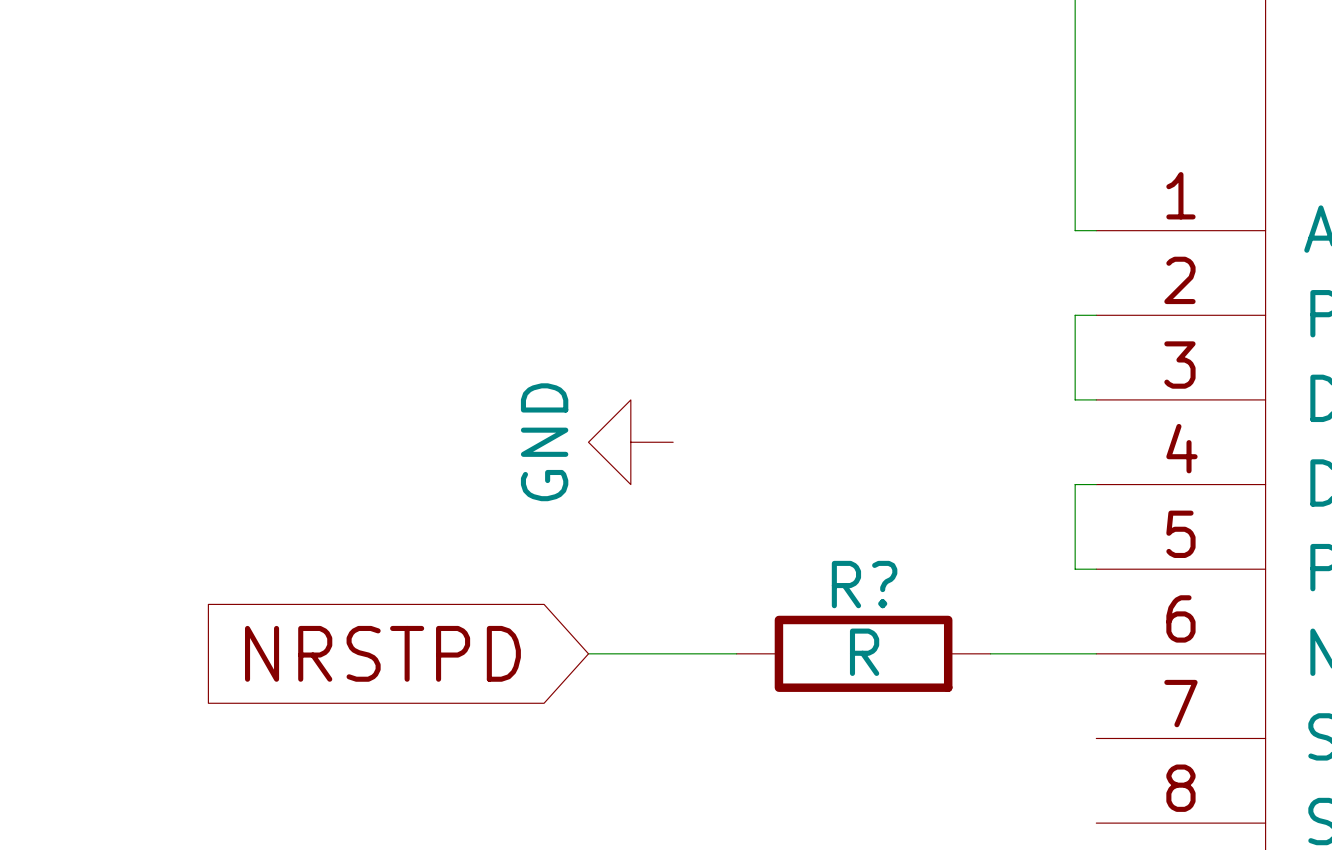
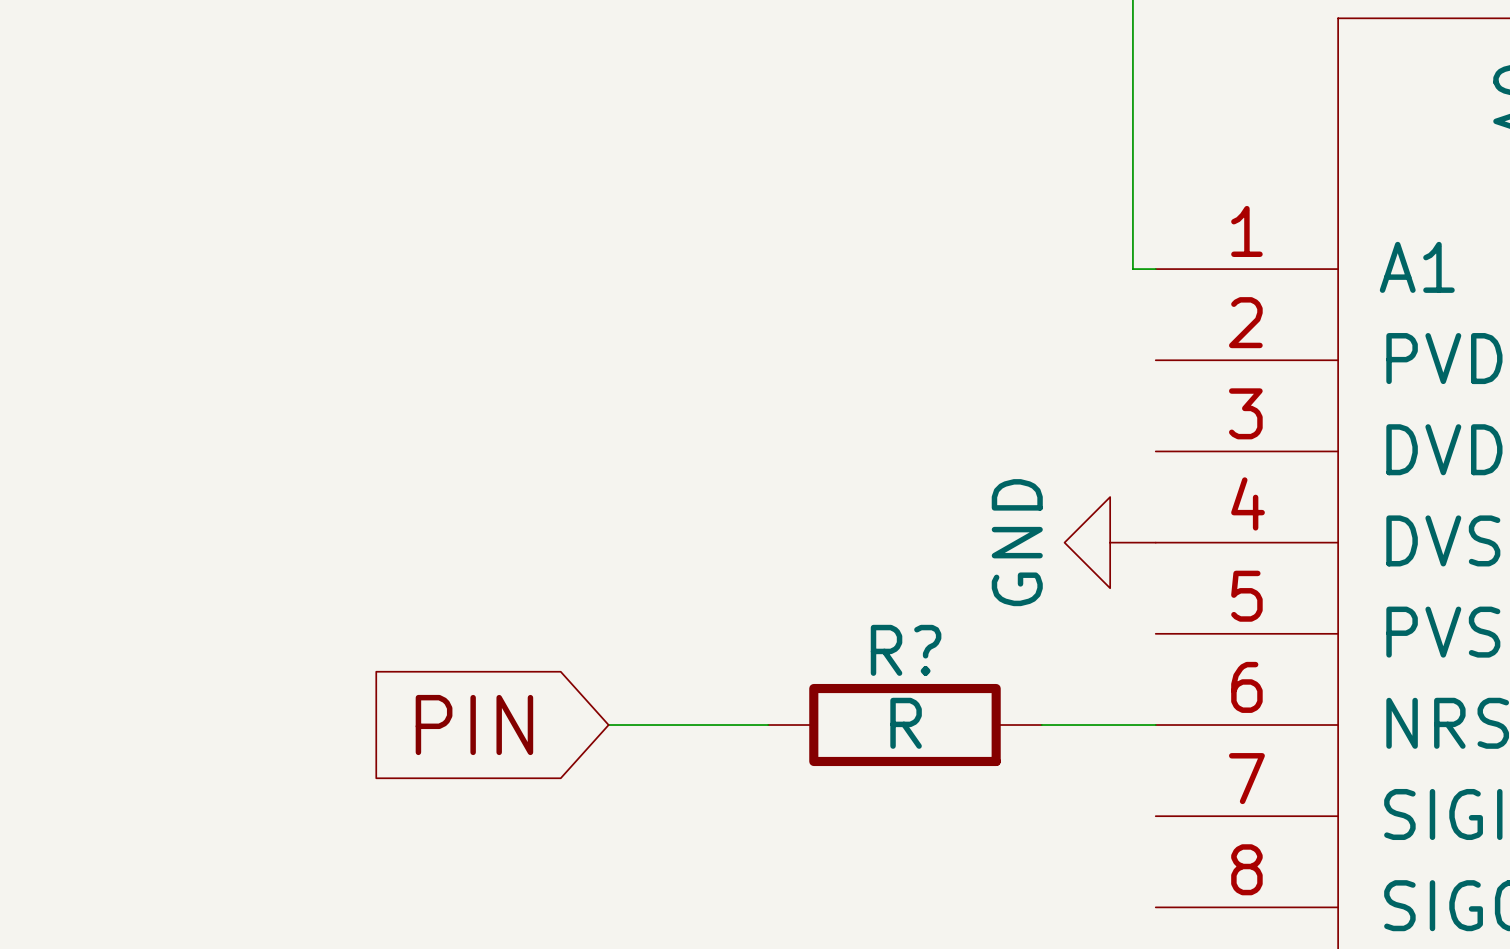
wire: (1096, 315) (1075, 315) (1075, 399) (1096, 399) -> none
power symbol position: GND (630, 442) -> GND (1110, 542)
wire: (1096, 484) (1075, 484) (1075, 569) (1096, 569) -> none
global label: NRSTPD (382, 653) -> PIN (474, 725)

